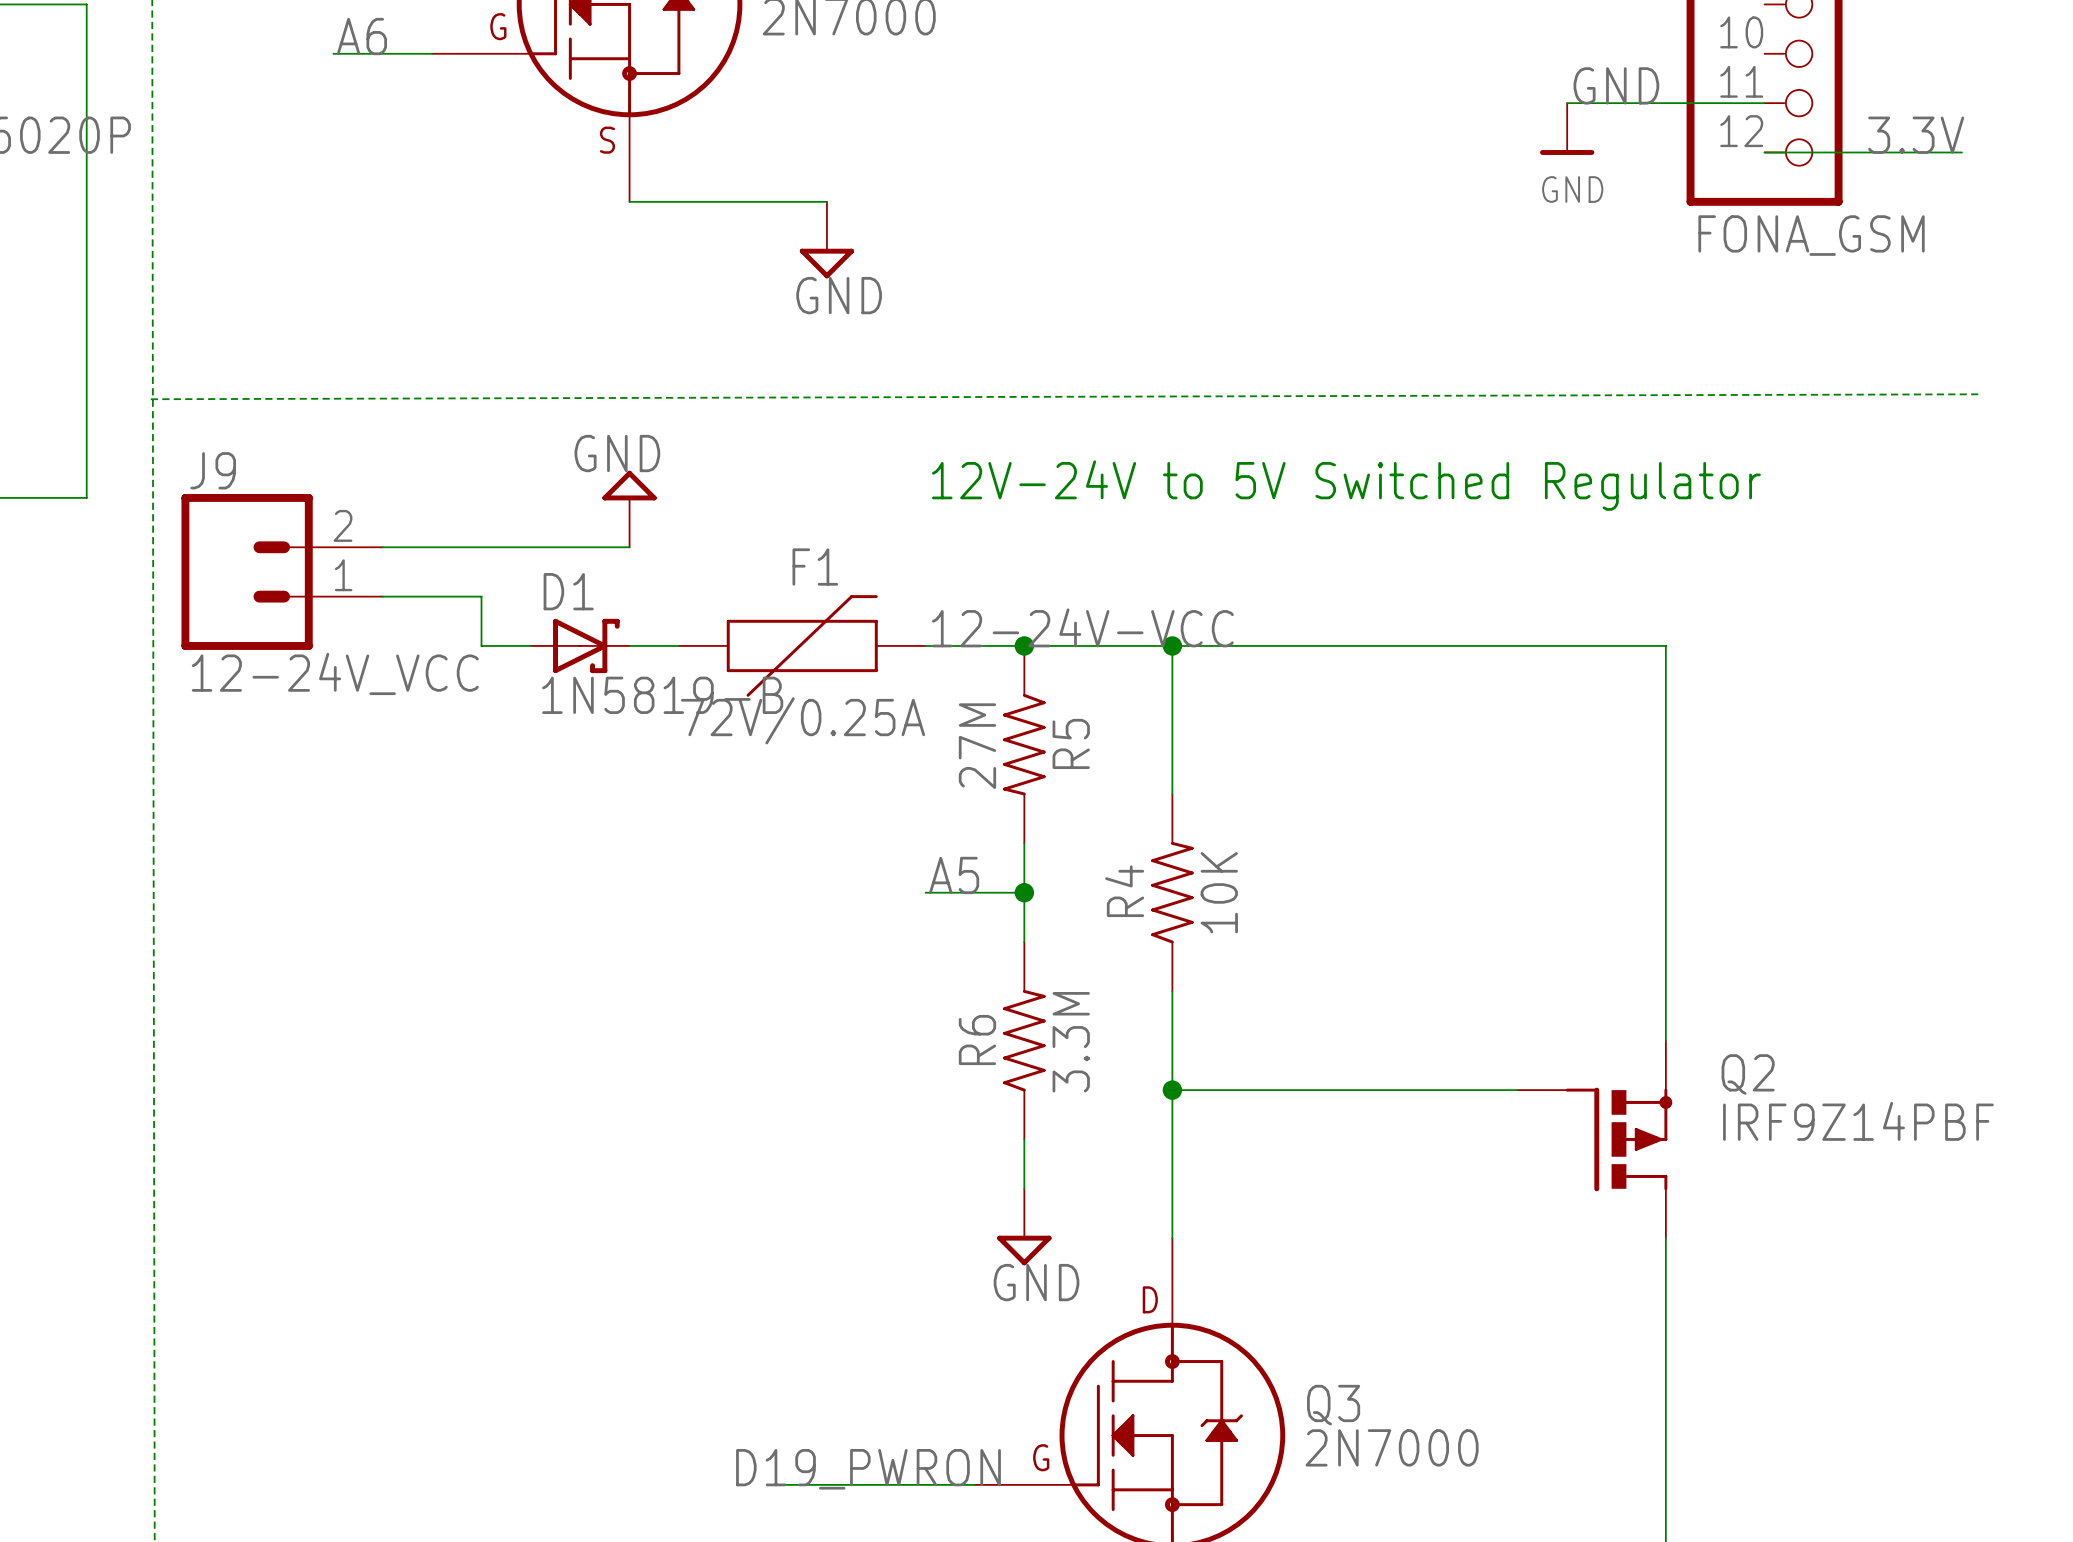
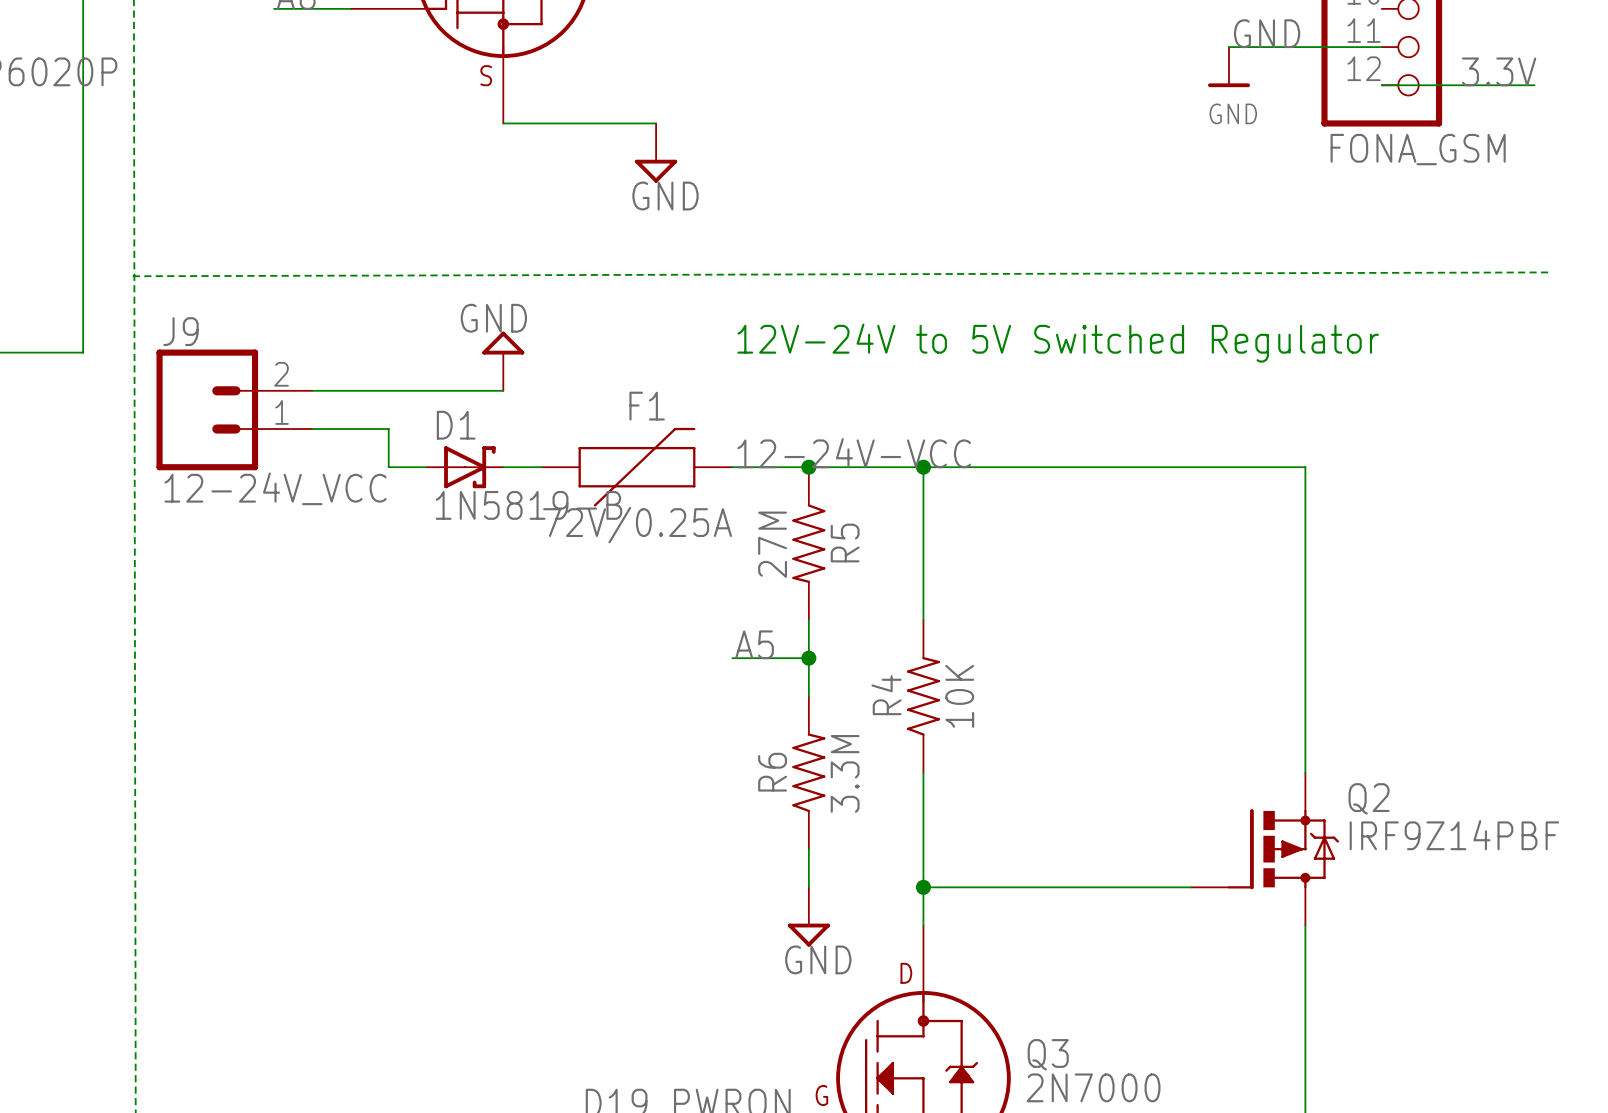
R4 position: (1172, 892) -> (923, 696)
Q2 symbol: [1517, 1040, 1673, 1239] -> [1190, 772, 1340, 926]
wire: (1172, 1090) (1517, 1090) -> (923, 887) (1190, 887)
junction position: (1172, 1090) -> (923, 887)

